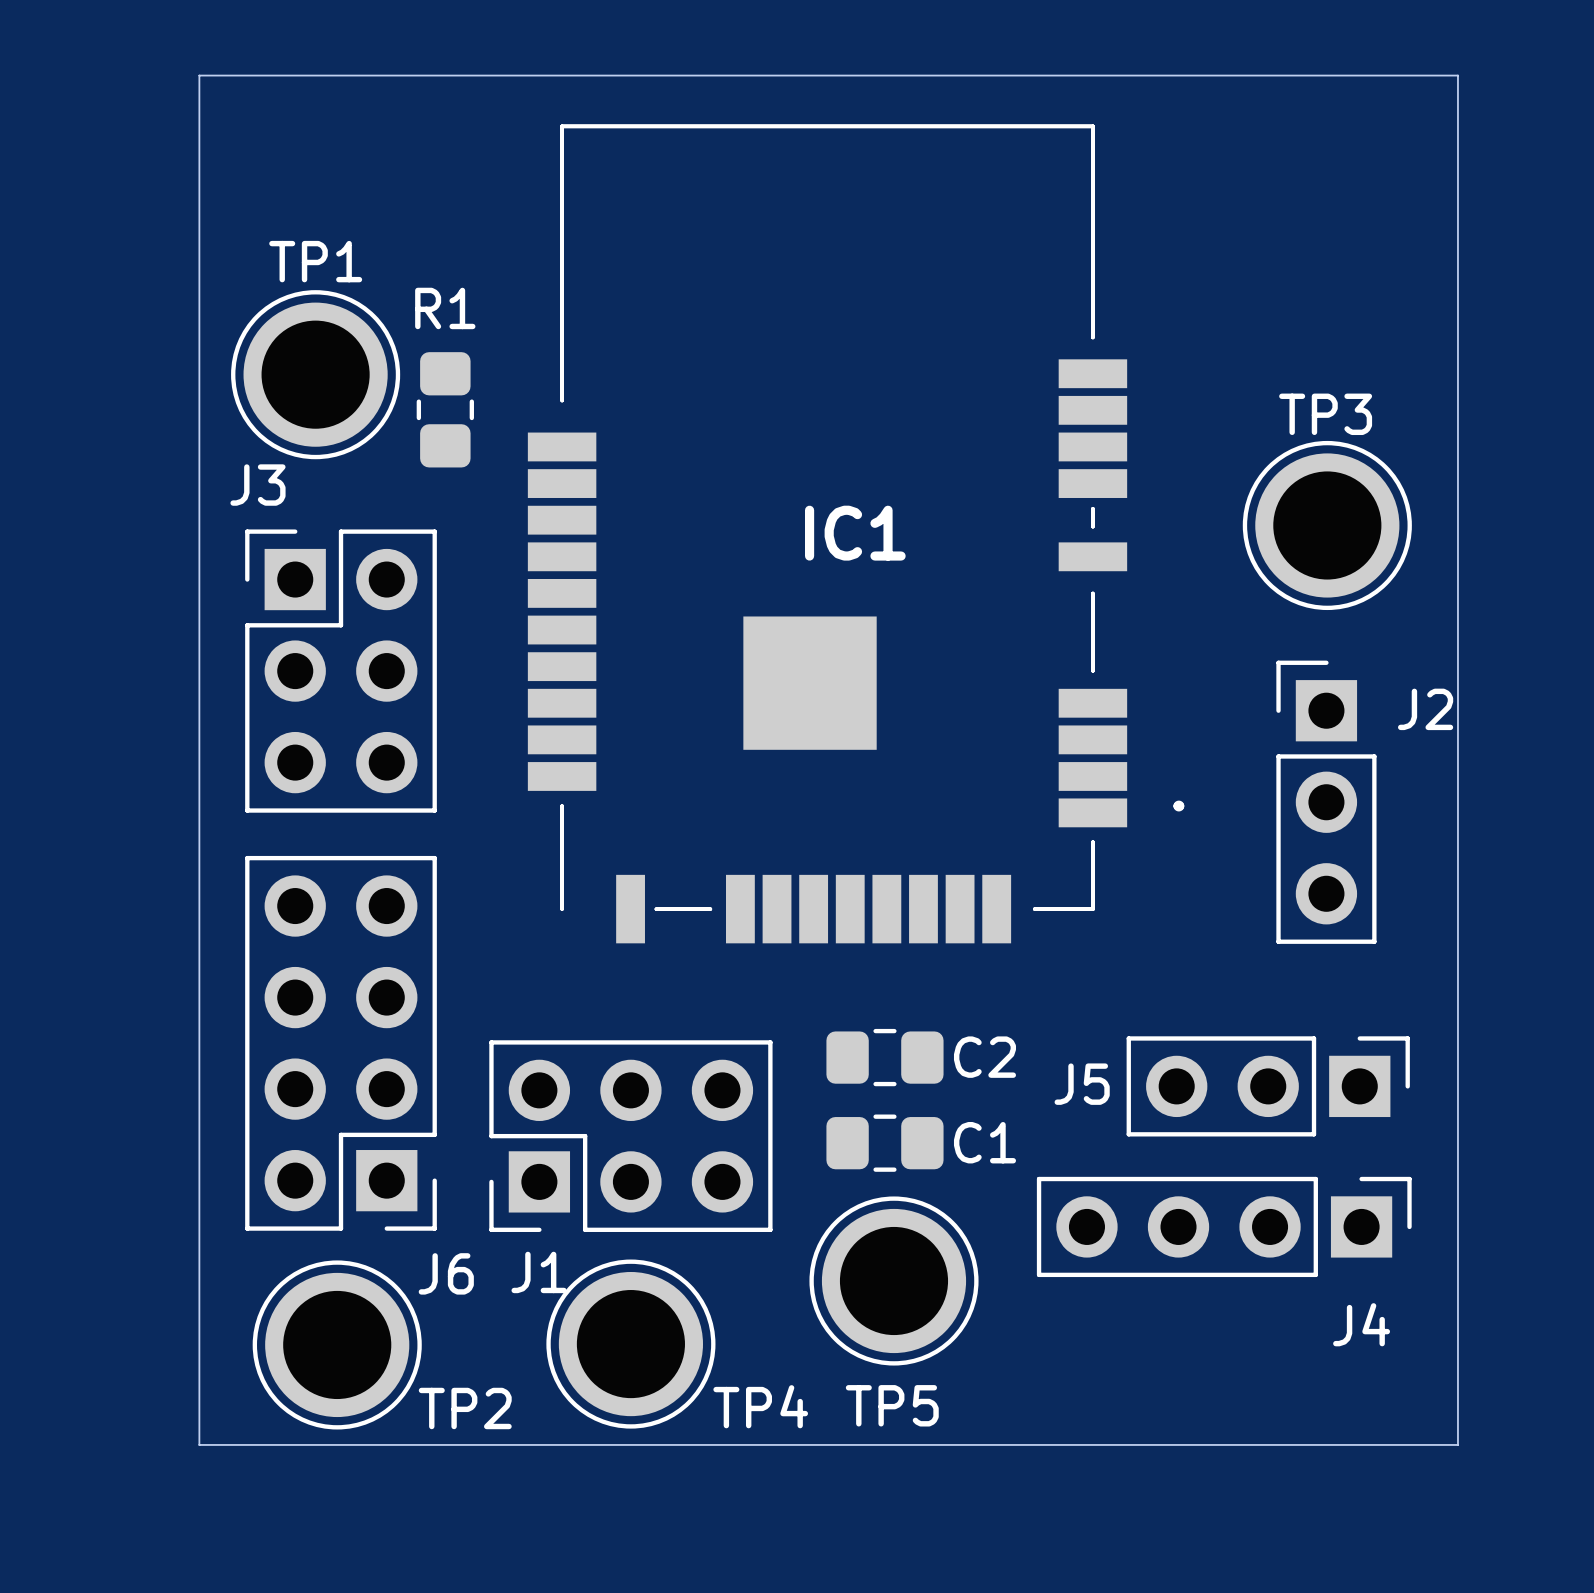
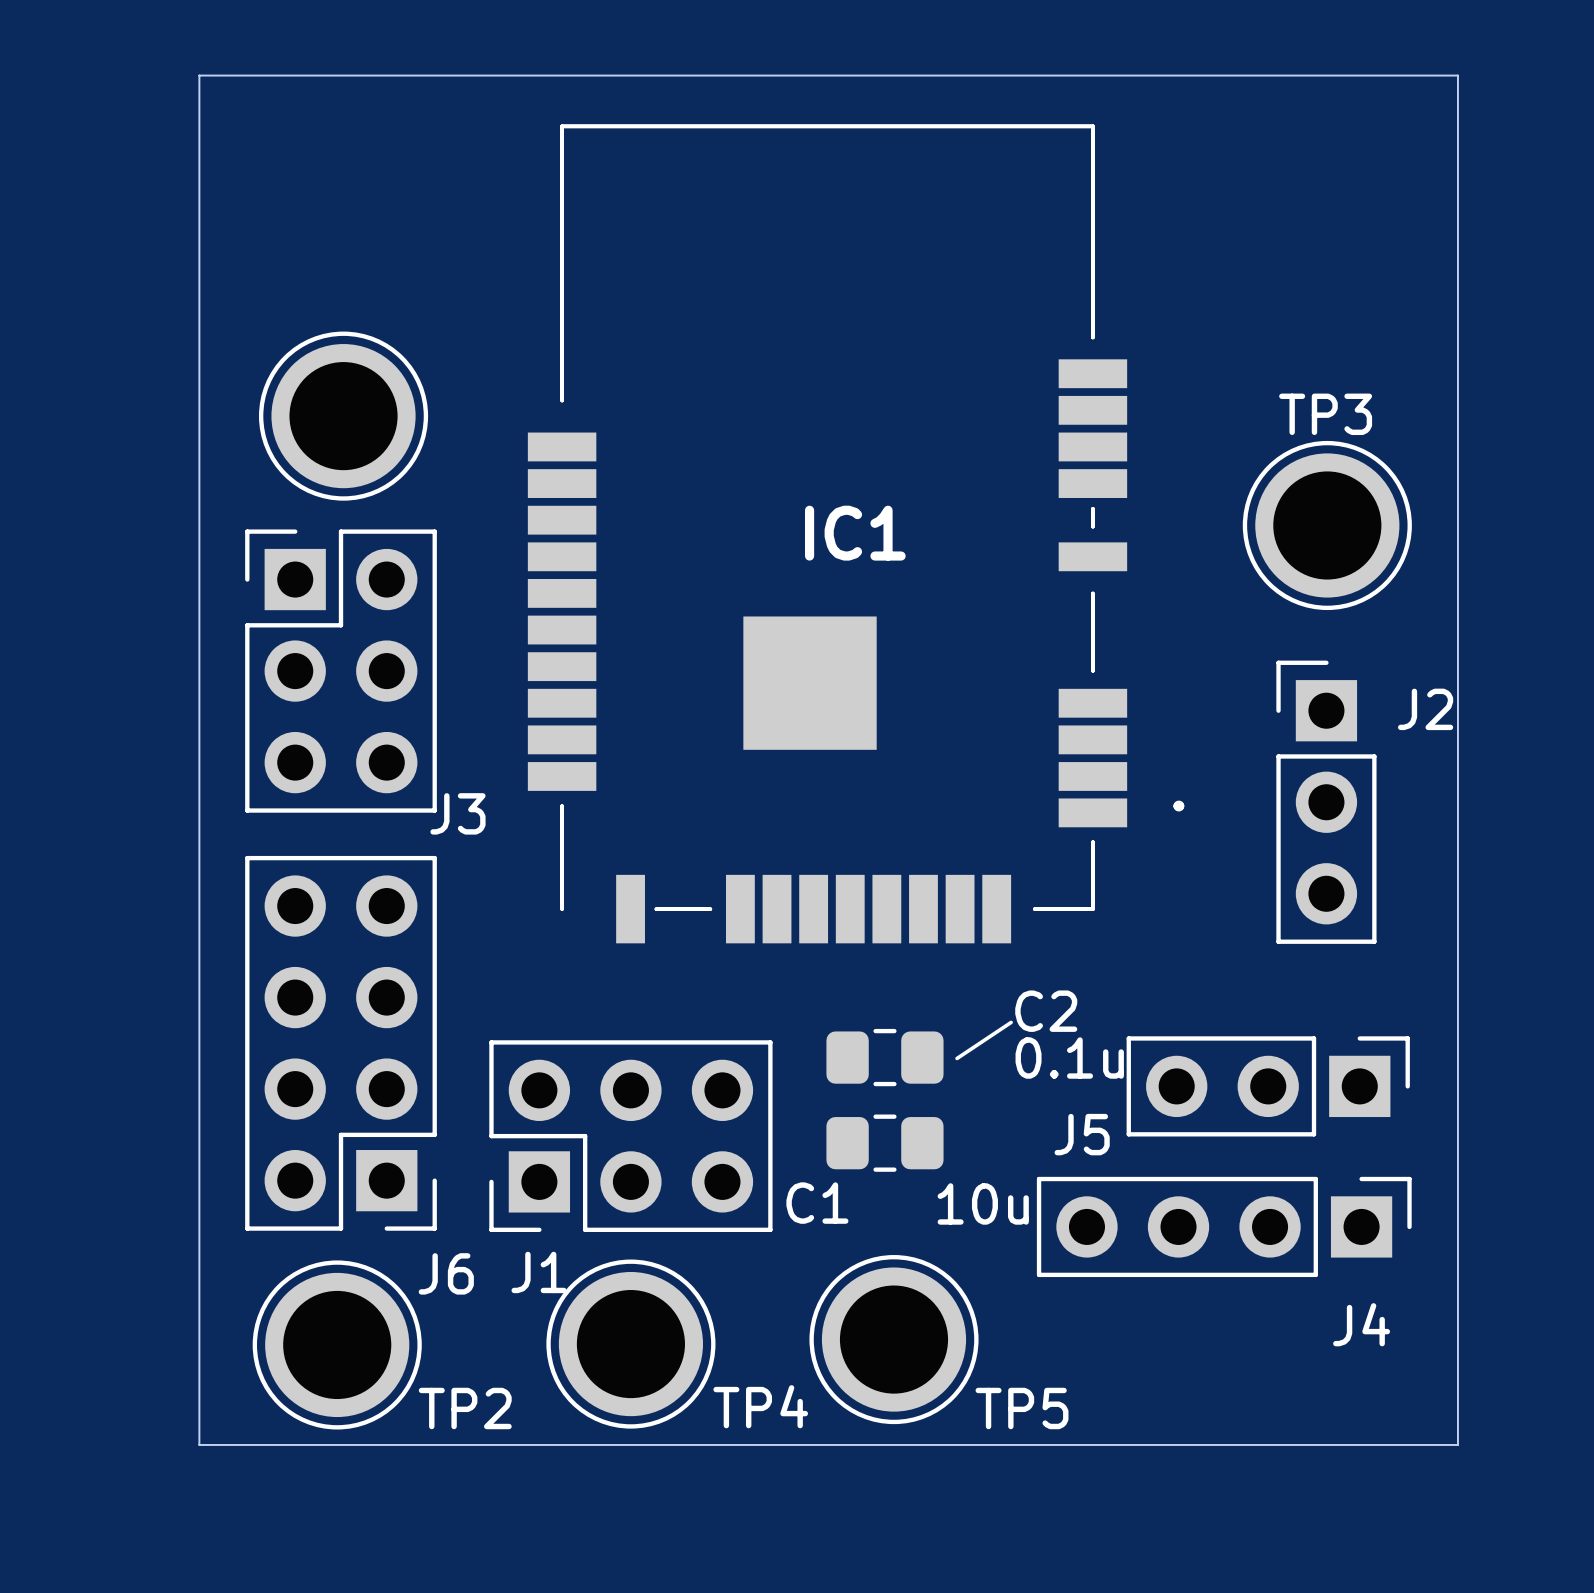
TP1: (315, 374) -> none
R1: (445, 409) -> none
part: none -> (343, 416)
J3 name position: J3 (257, 485) -> J3 (457, 813)
line: none -> (1011, 1022) (957, 1058)
C2 name position: C2 (984, 1057) -> C2 (1046, 1011)
C2 value: none -> 0.1u (1069, 1058)
J5 name position: J5 (1082, 1084) -> J5 (1082, 1134)
C1 name position: C1 (984, 1142) -> C1 (817, 1203)
C1 value: none -> 10u (983, 1203)
TP5 position: (893, 1281) -> (893, 1339)
TP5 name position: TP5 (892, 1405) -> TP5 (1022, 1408)

